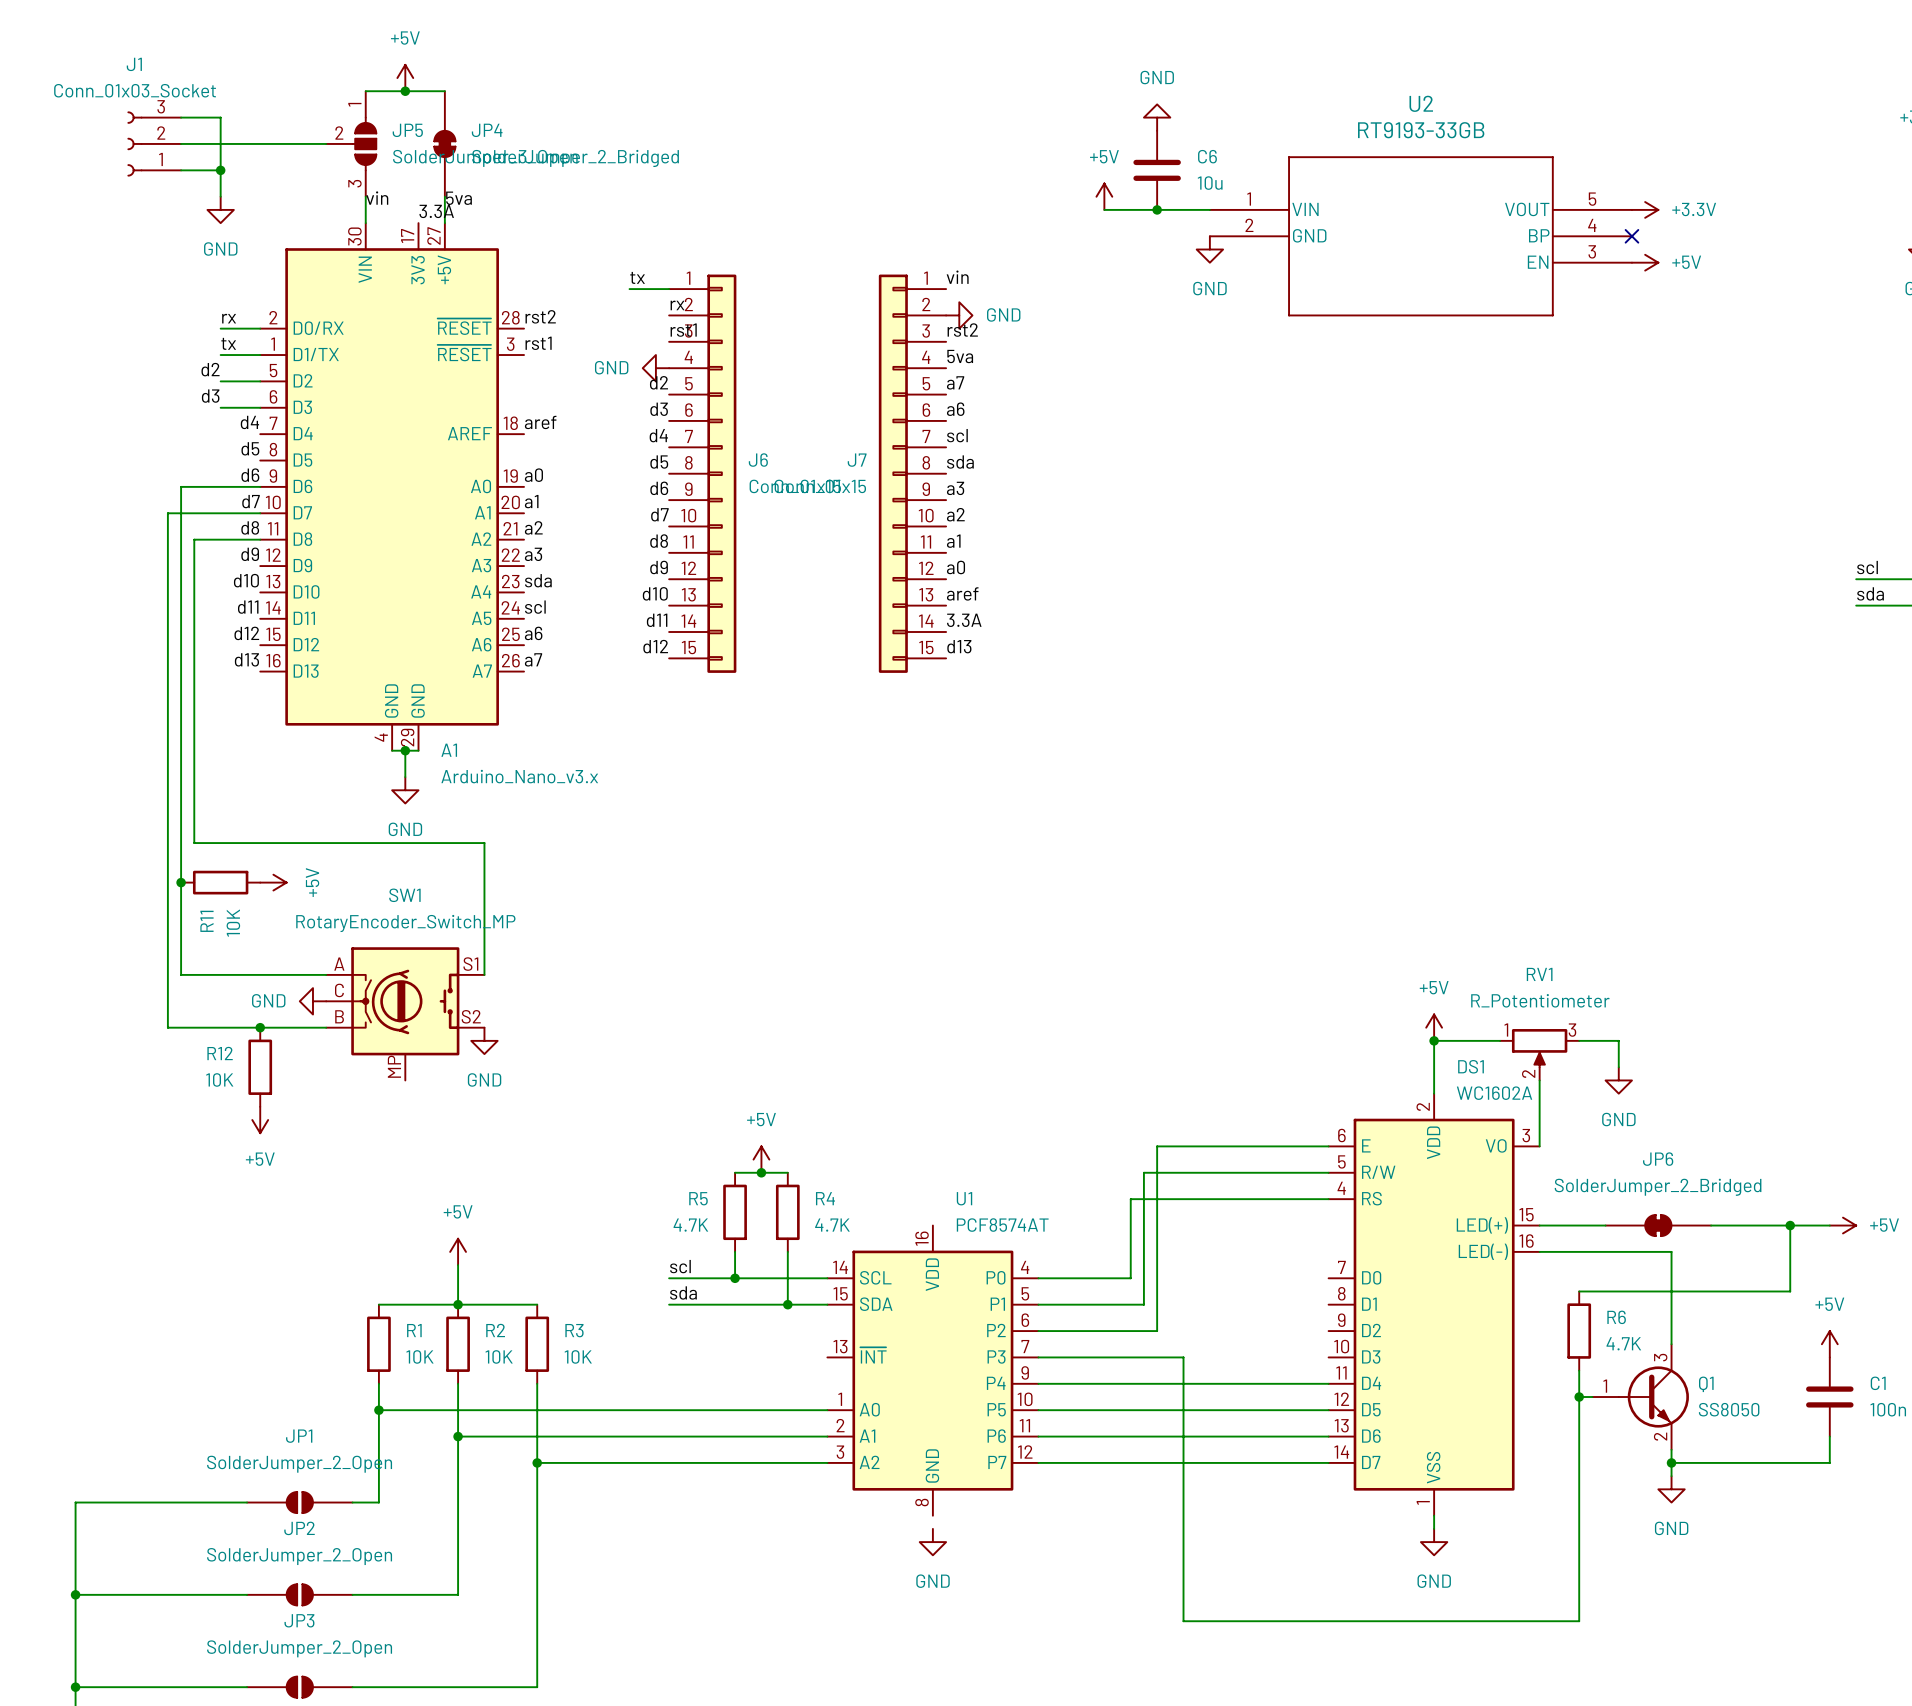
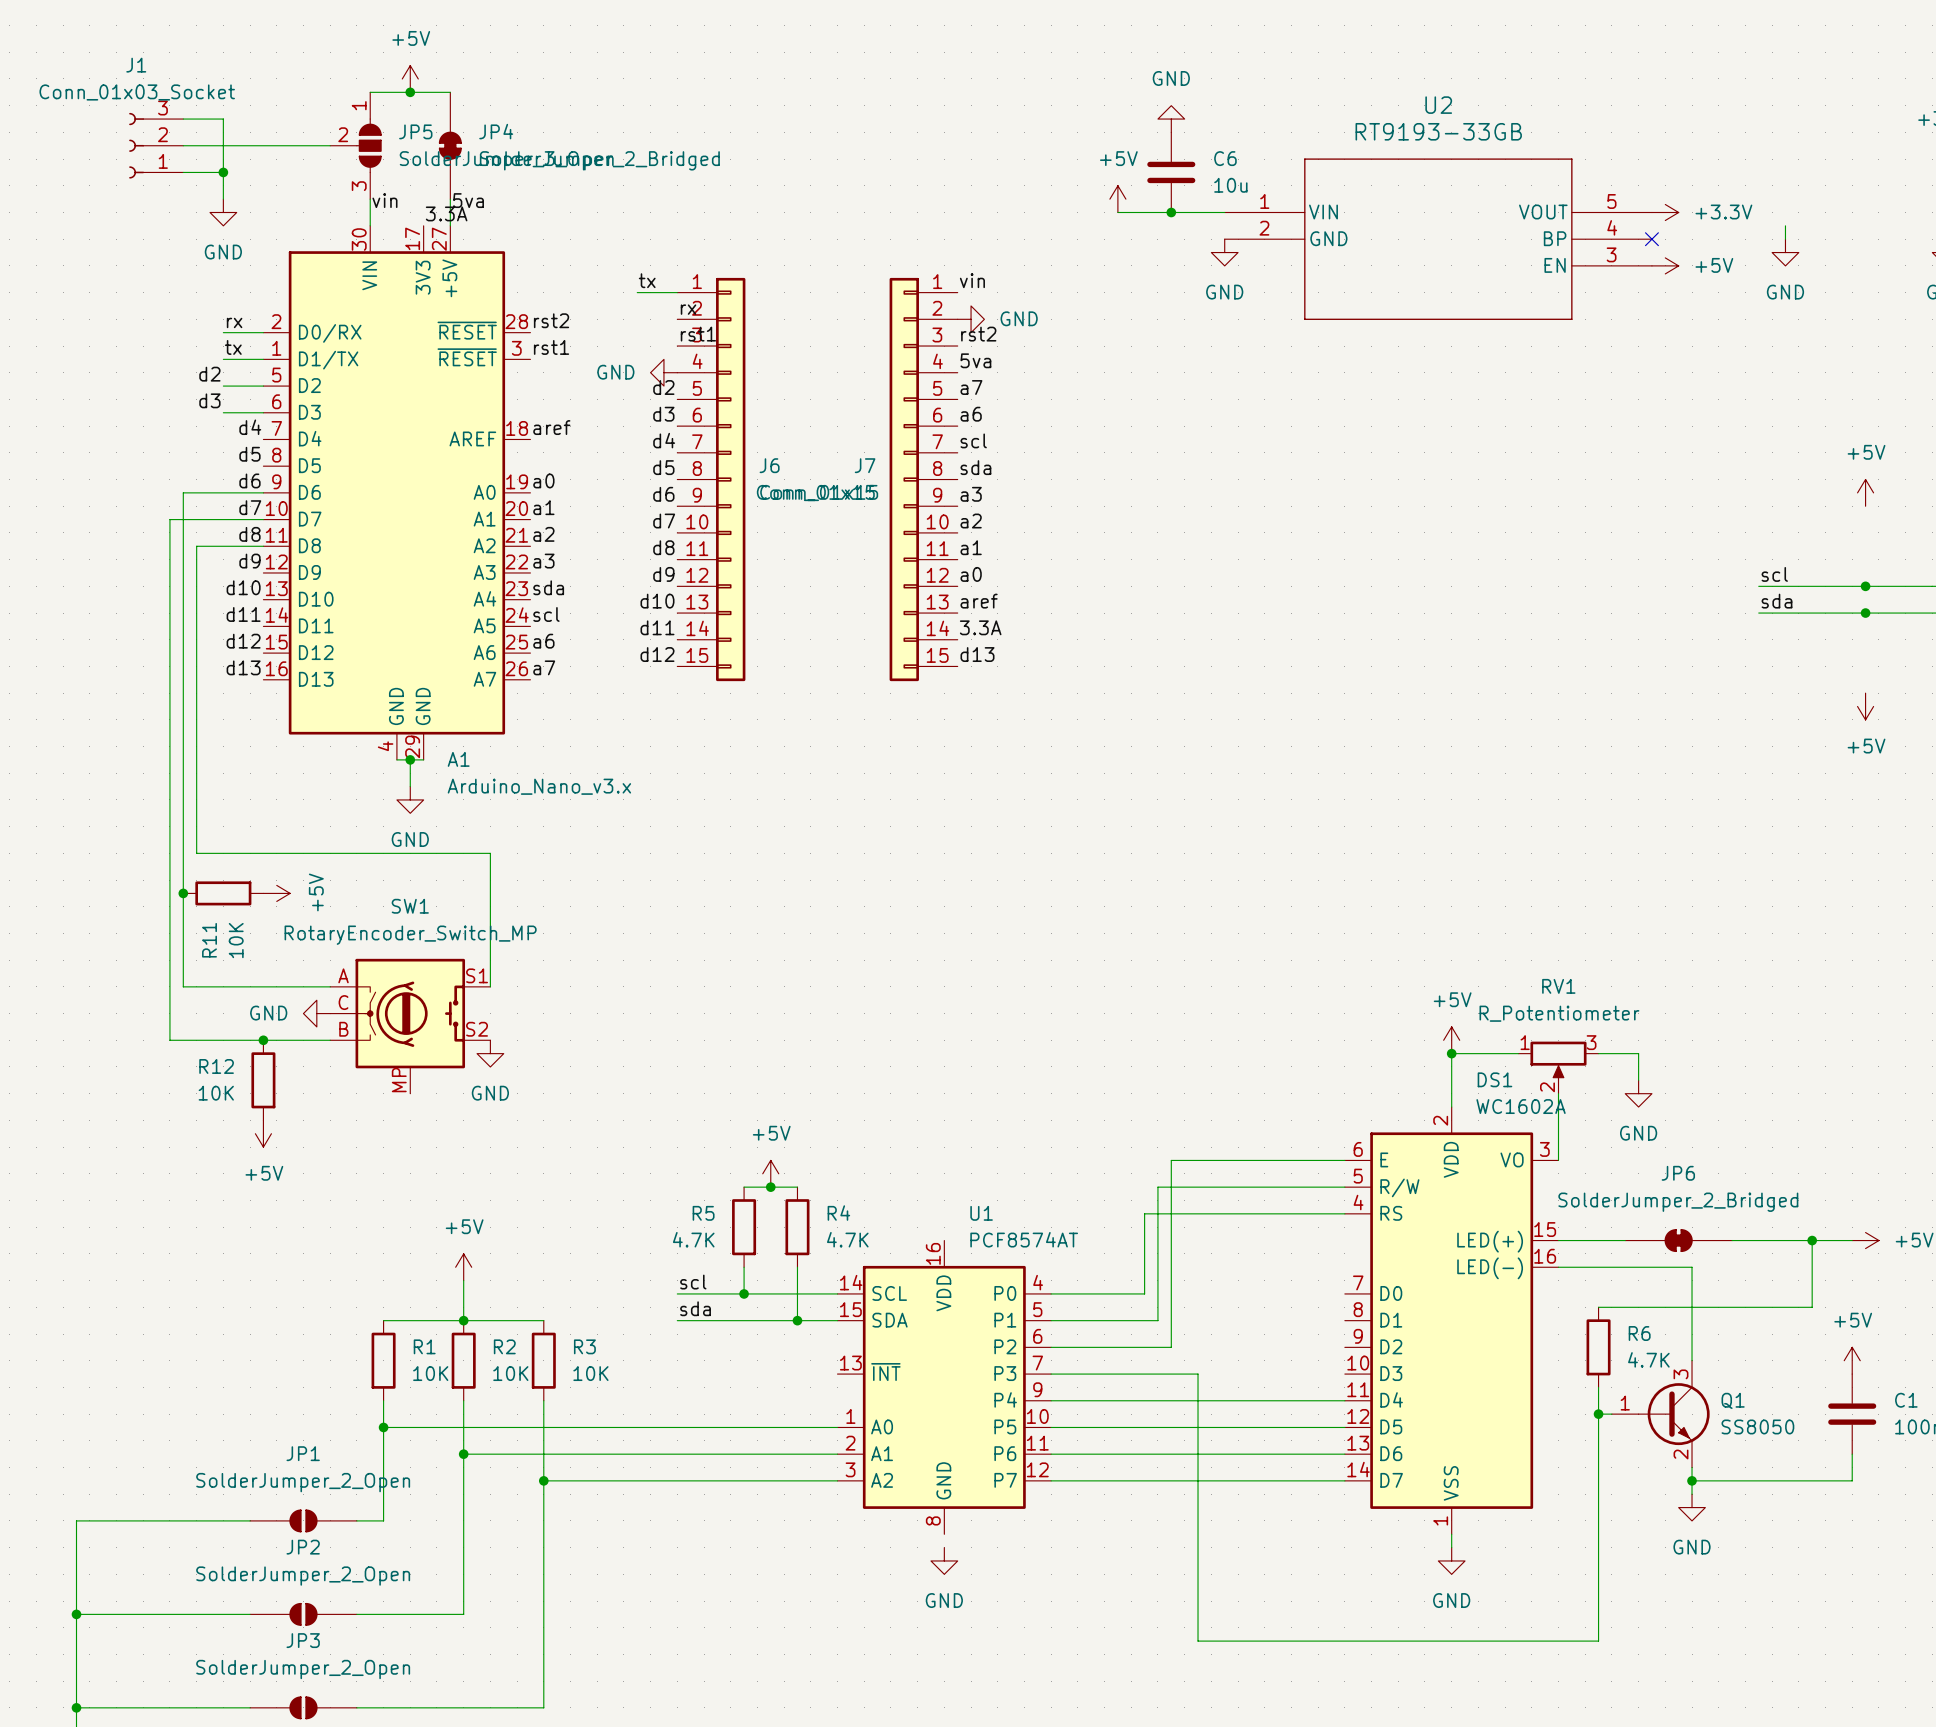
wire: none -> (1785, 225) (1785, 239)
power symbol: none -> GND (1785, 252)
power symbol: none -> +5V (1865, 492)
label position: scl (1867, 567) -> scl (1774, 574)
wire: none -> (1758, 586) (1878, 586)
junction: none -> (1865, 586)
label position: sda (1870, 593) -> sda (1776, 601)
wire: none -> (1758, 613) (1878, 613)
junction: none -> (1865, 613)
power symbol: none -> +5V (1865, 706)

